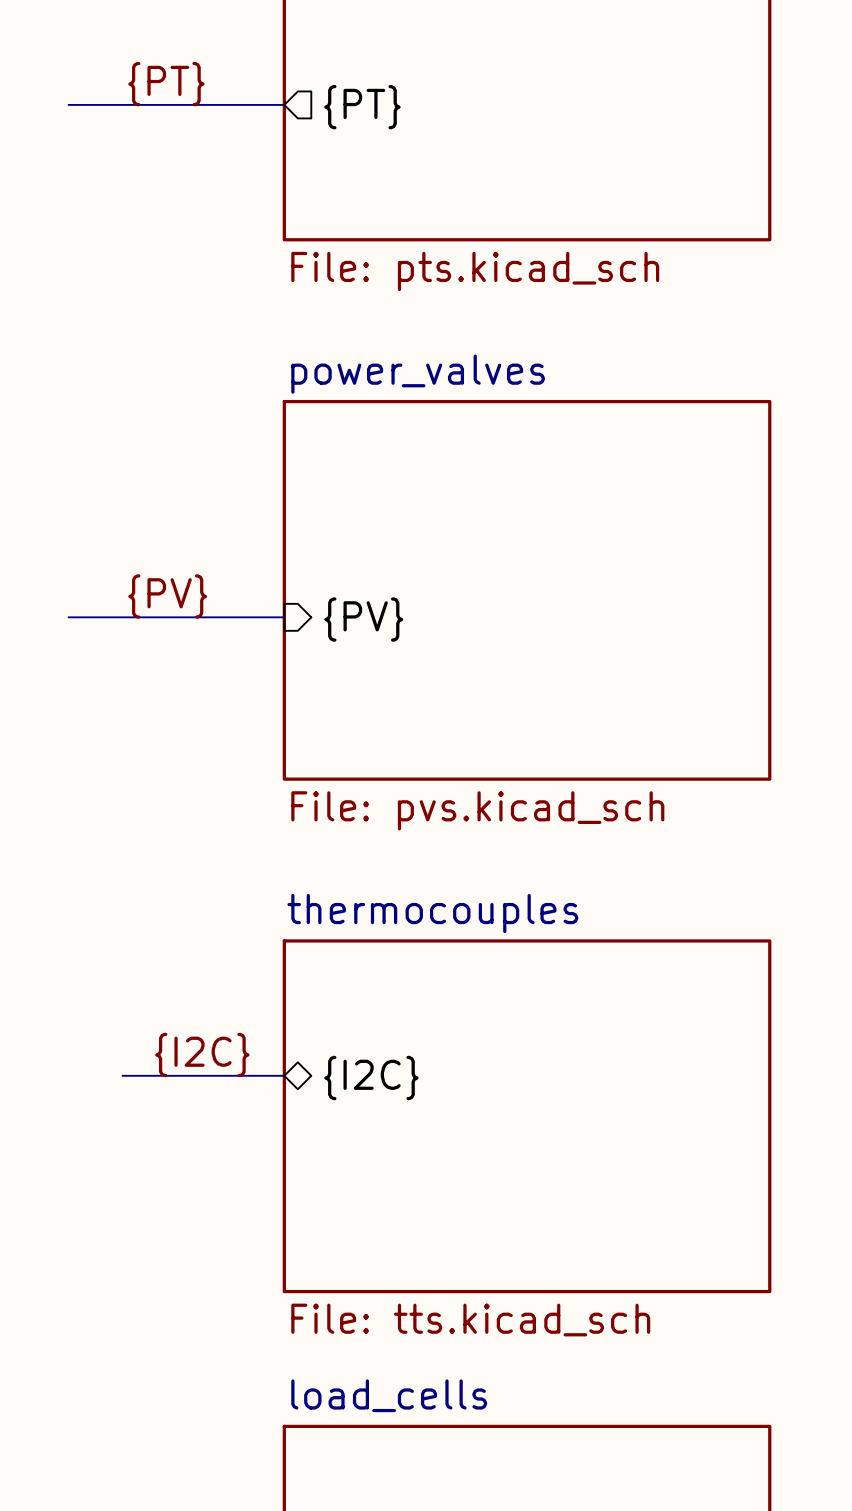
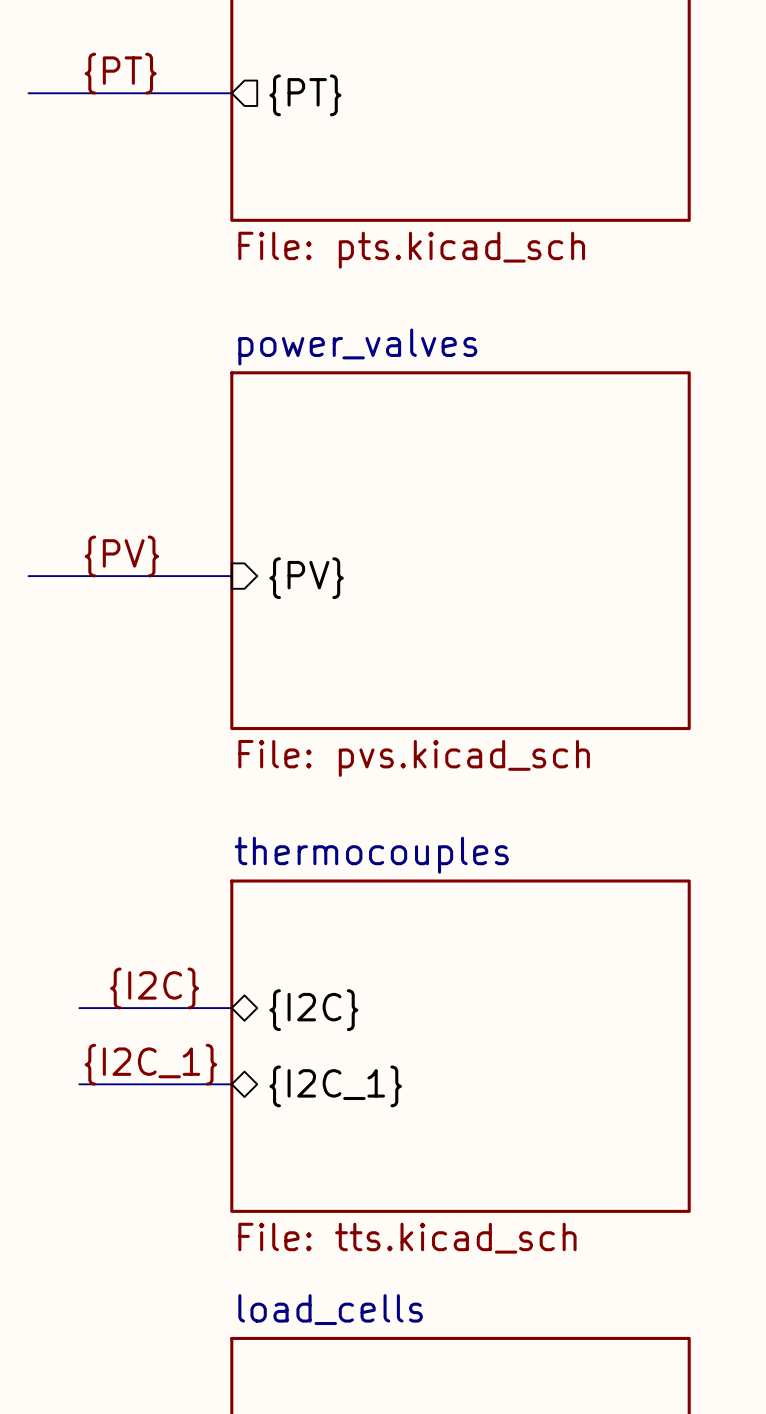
label: none -> {I2C_1} (150, 1064)
bus: none -> (79, 1084) (231, 1084)
sheet pin: none -> {I2C_1} (335, 1086)

